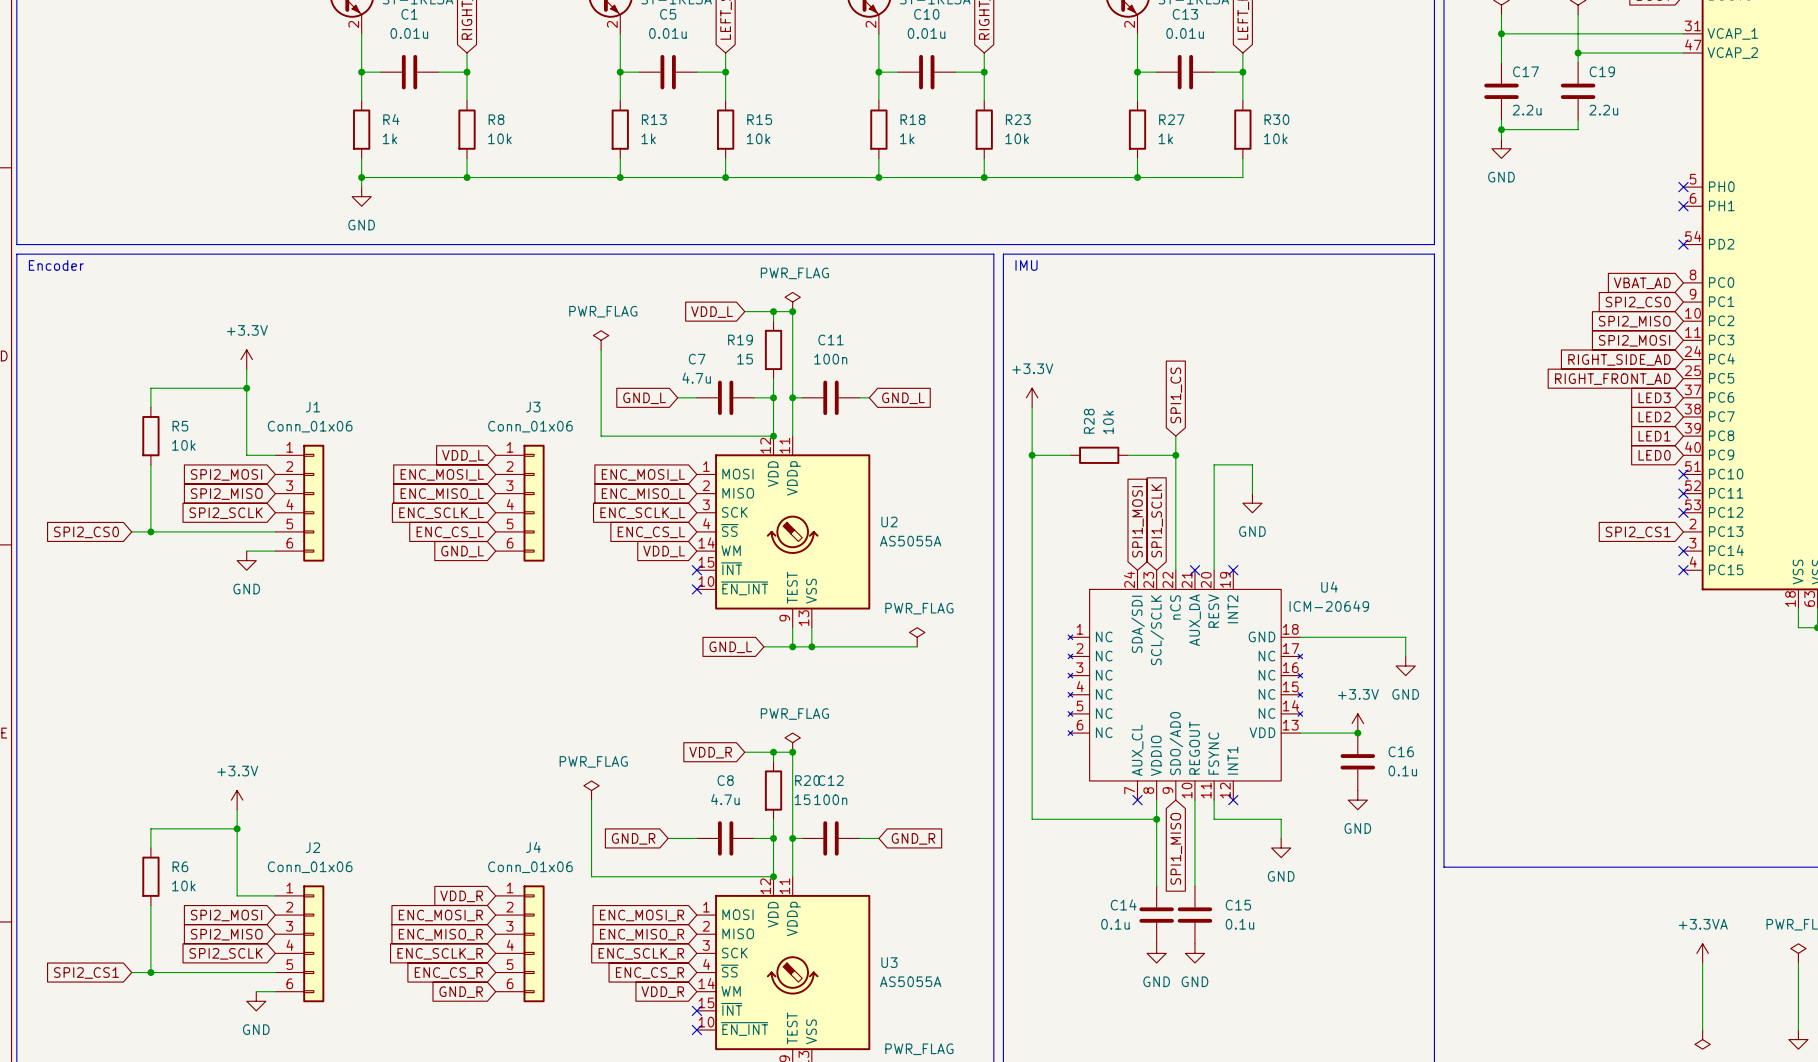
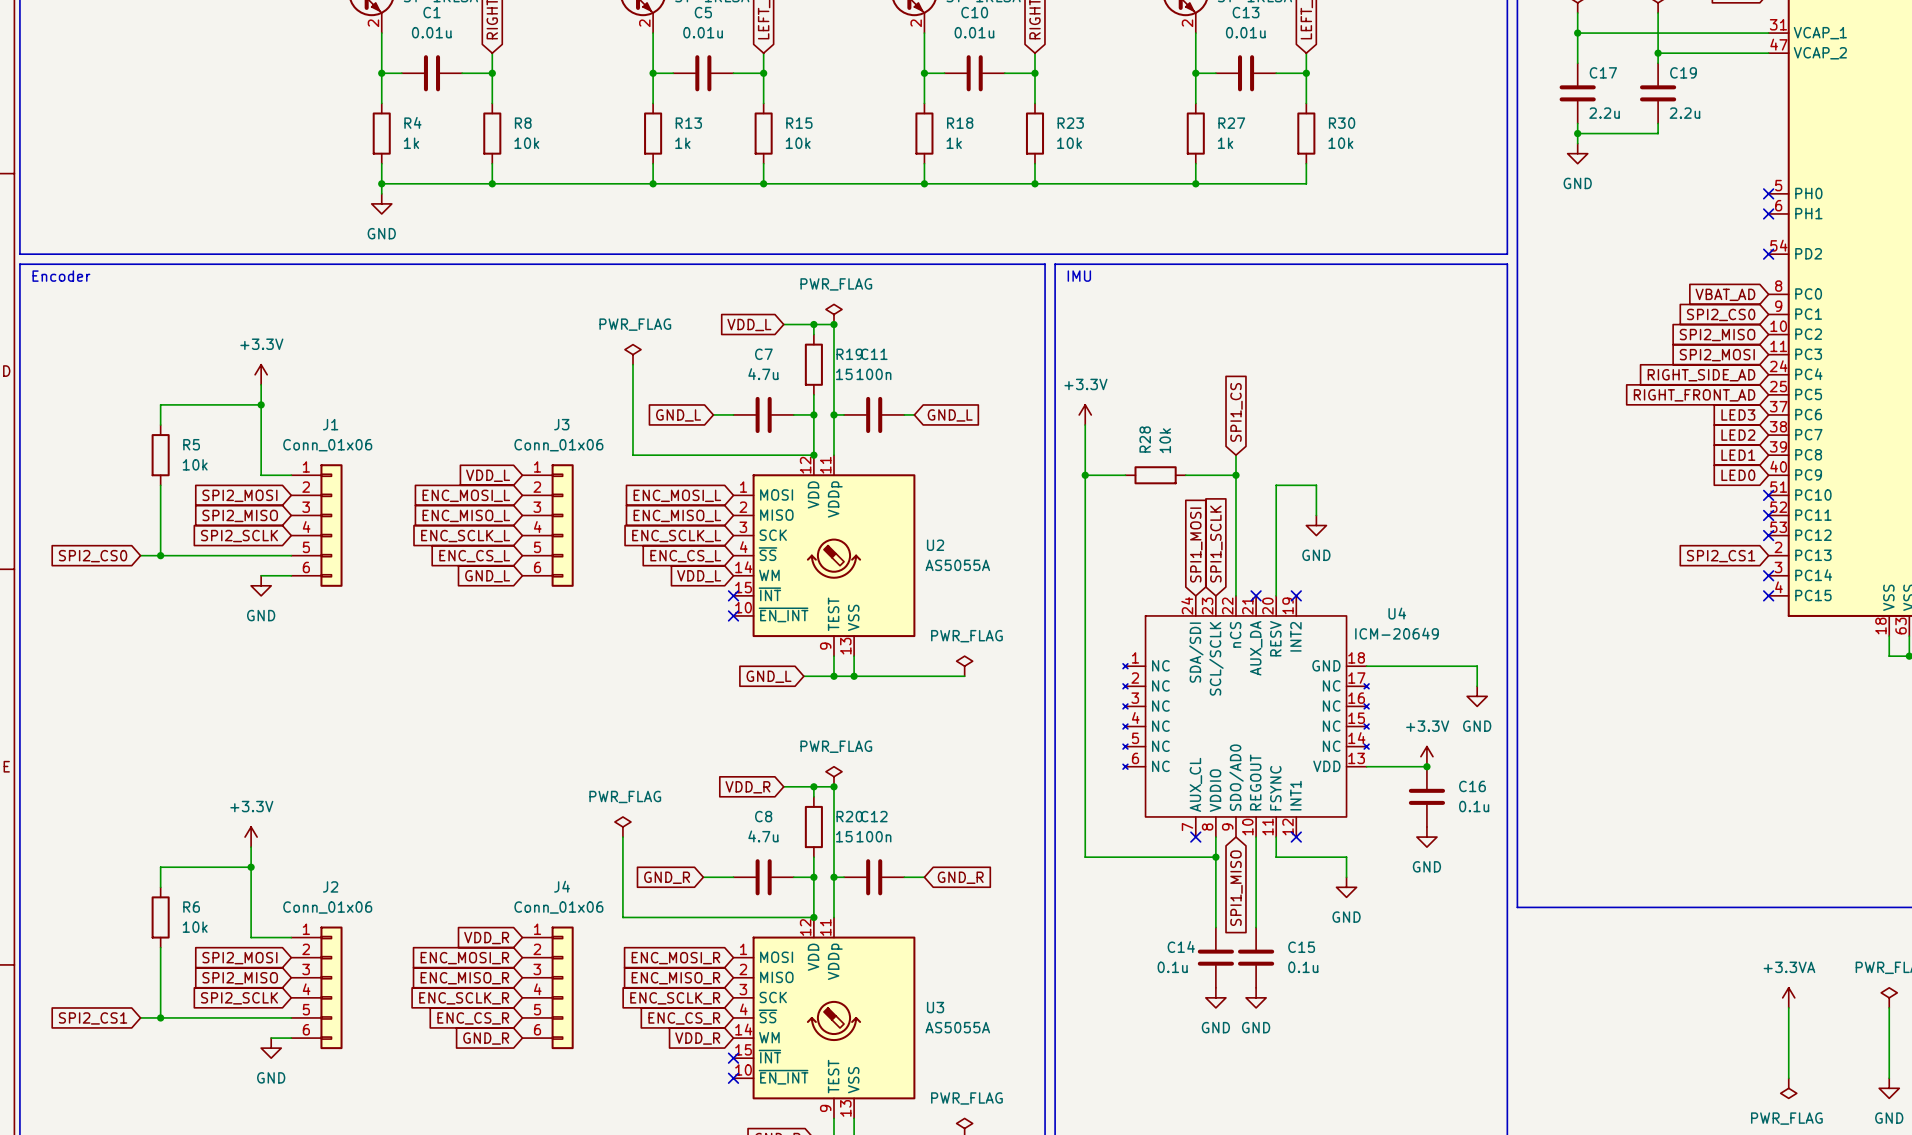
R19 name position: R19 (740, 340) -> R19 (849, 354)
C7 name position: C7 (697, 359) -> C7 (763, 354)
R19 value position: 15 (745, 359) -> 15 (844, 374)
C7 value position: 4.7u (696, 378) -> 4.7u (763, 374)

